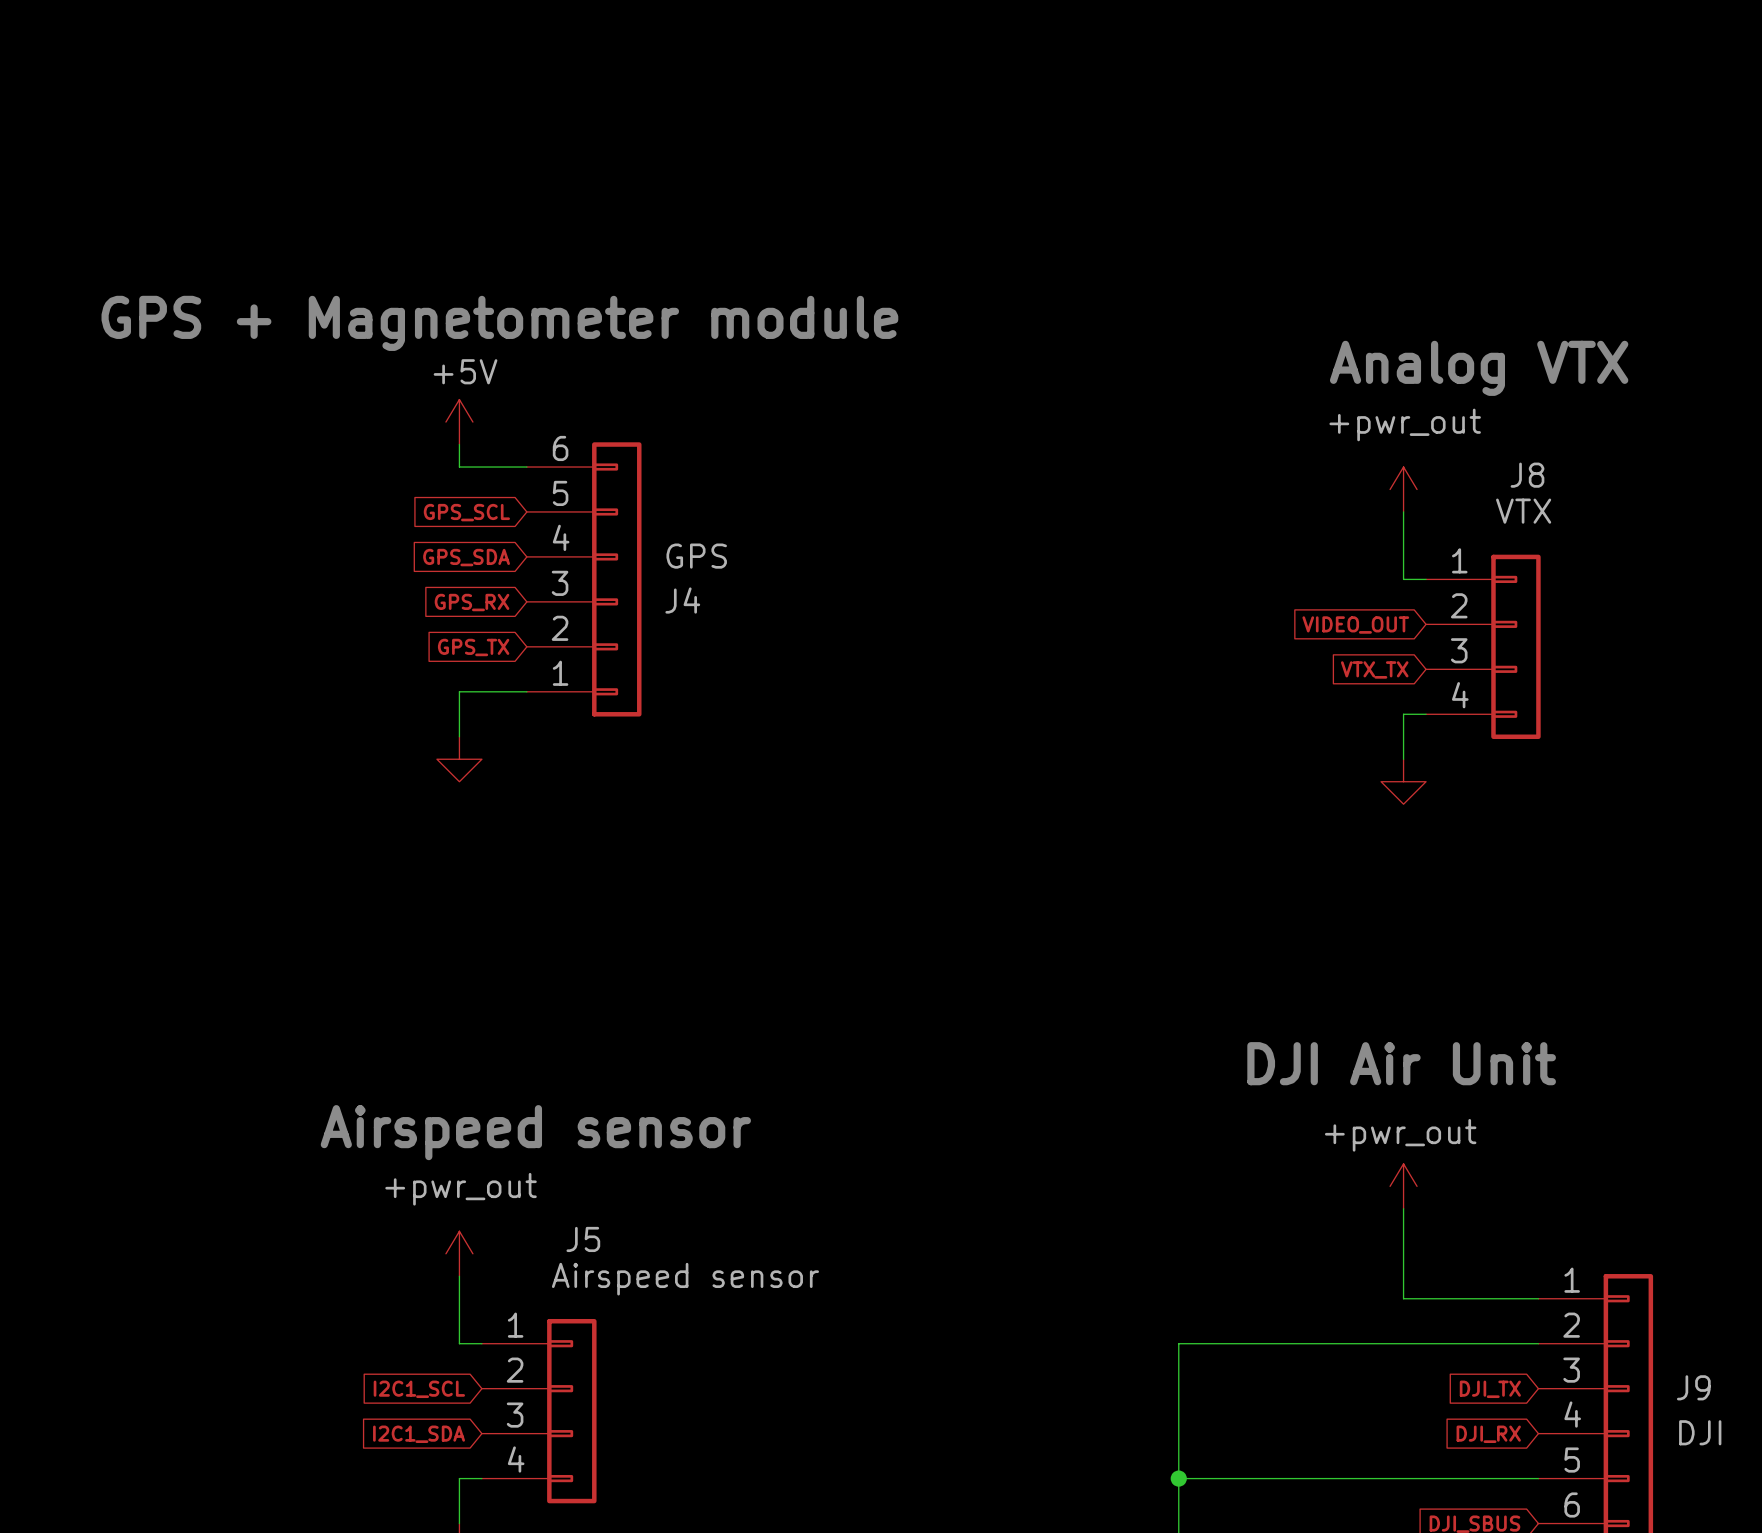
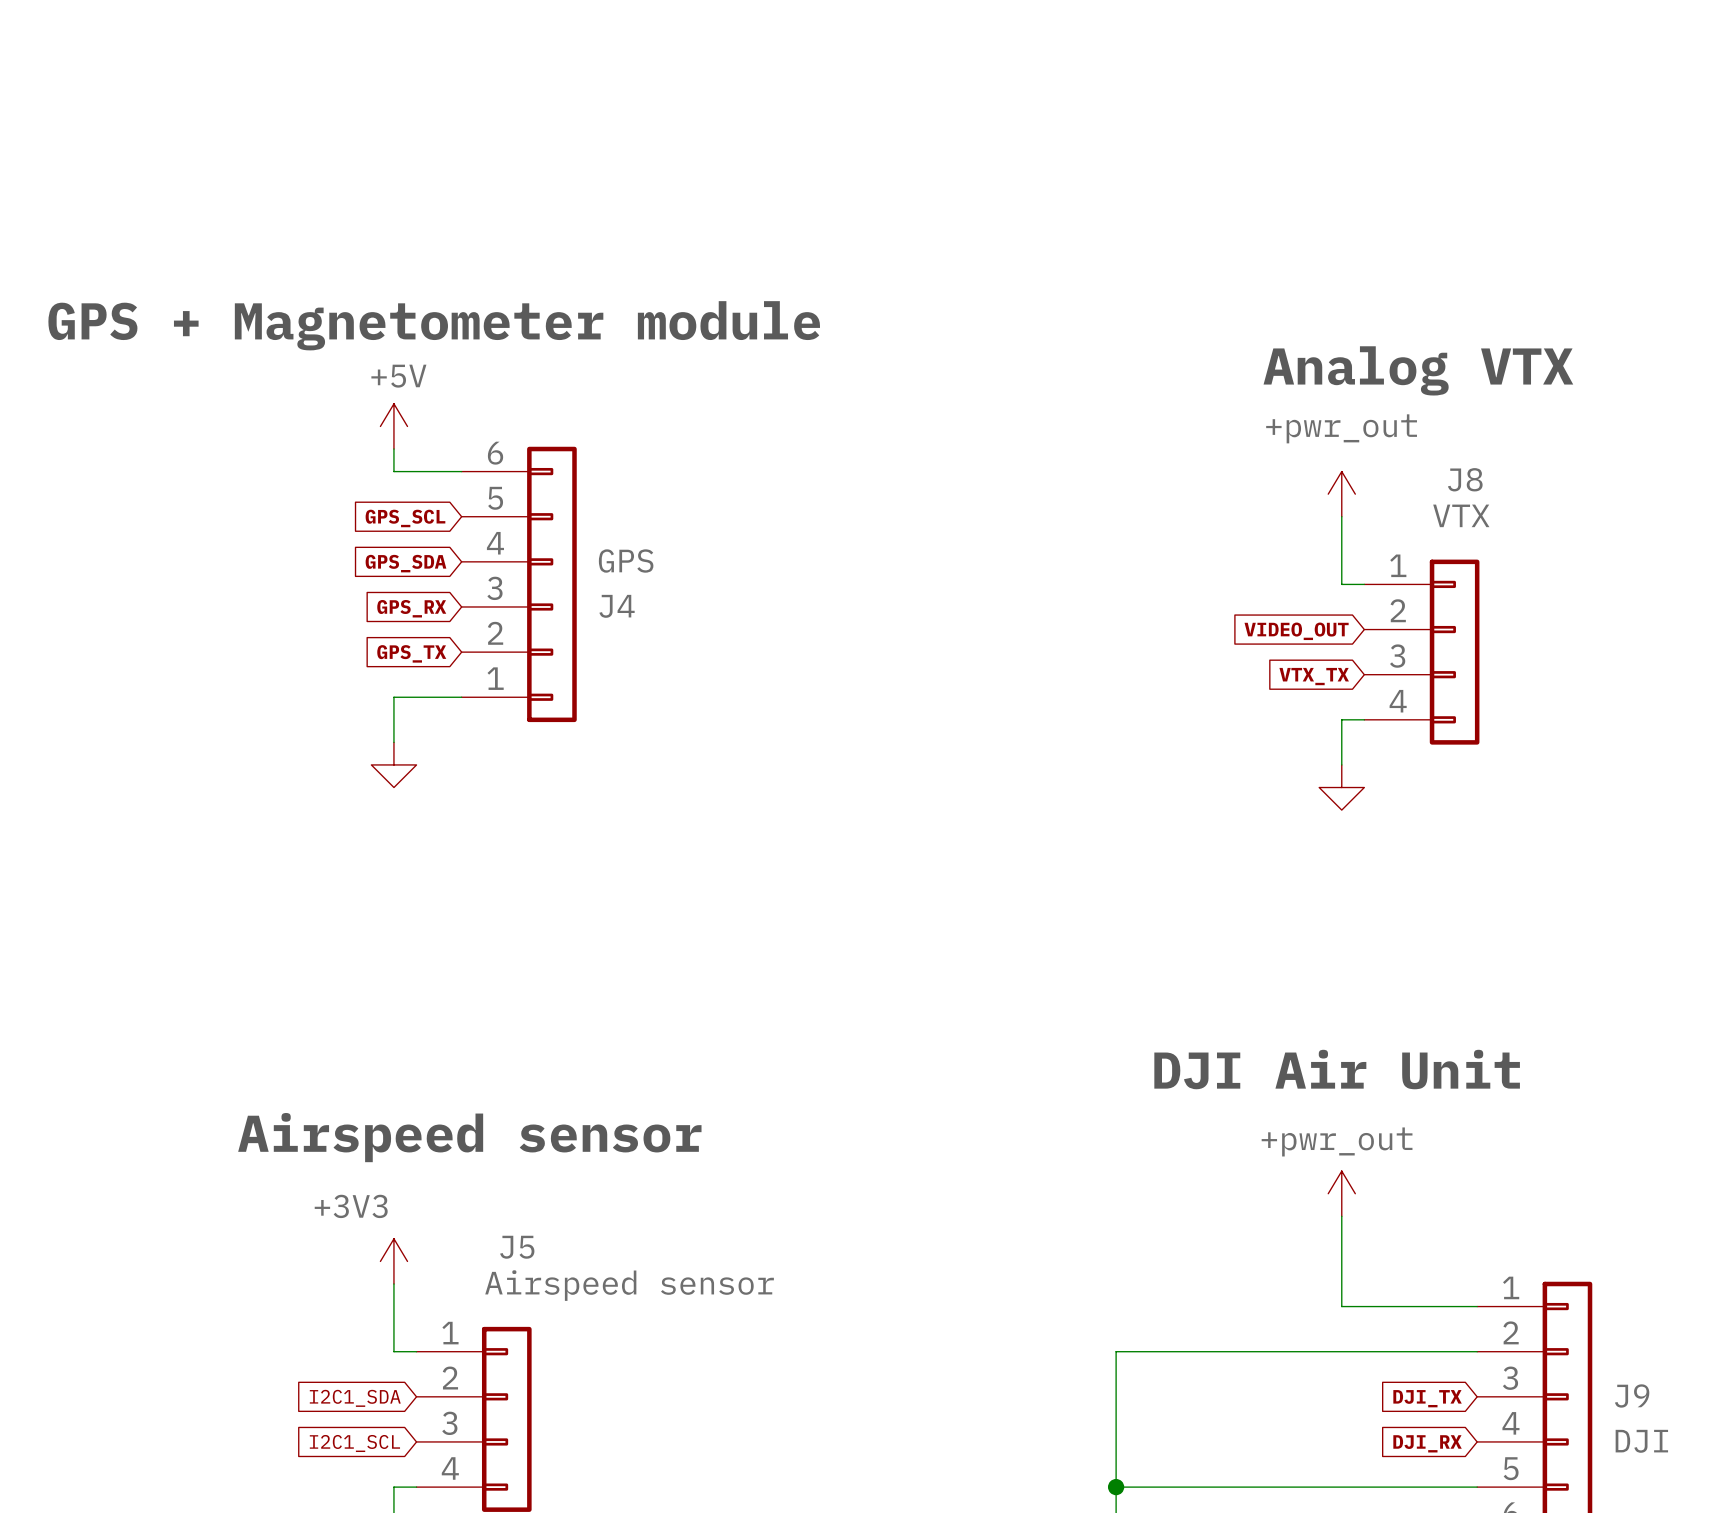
power symbol: +pwr_out (459, 1253) -> +3V3 (393, 1261)
global label: I2C1_SCL (419, 1389) -> I2C1_SDA (355, 1398)
global label: I2C1_SDA (419, 1434) -> I2C1_SCL (354, 1443)

